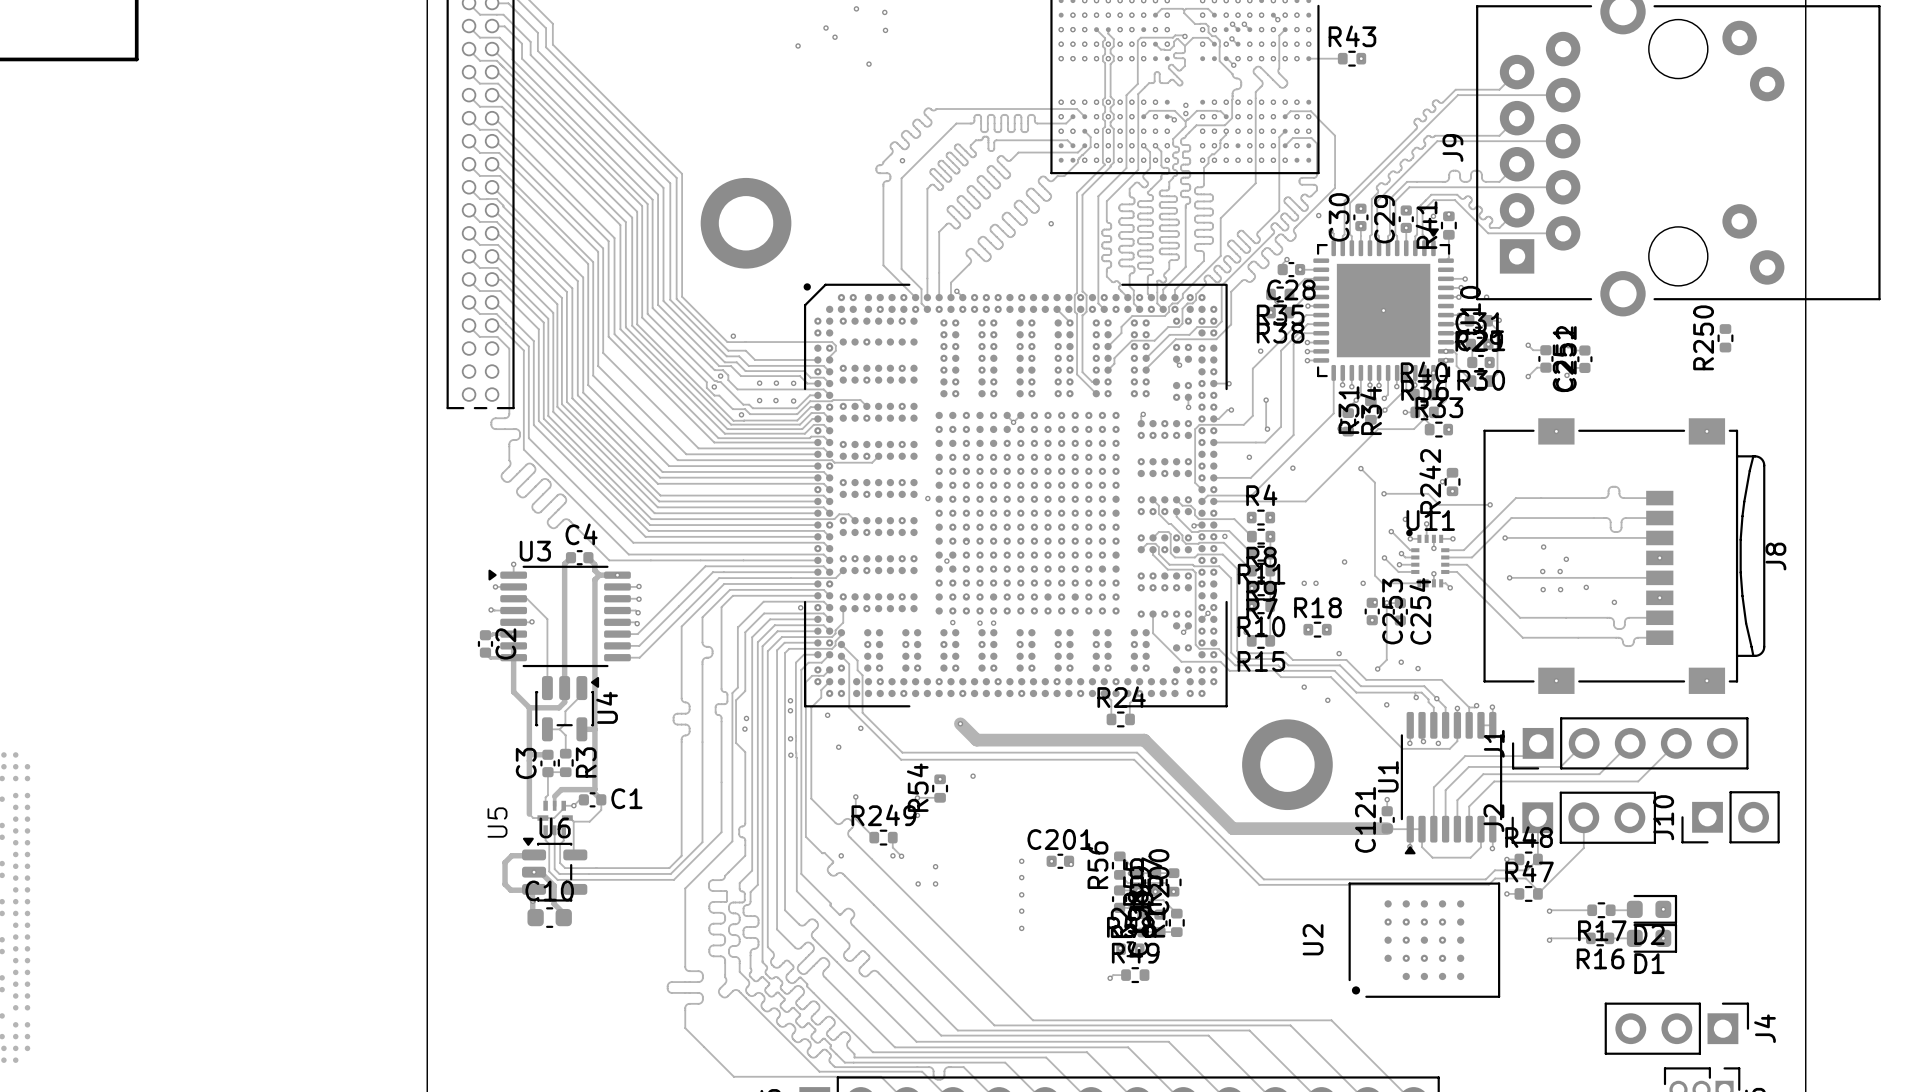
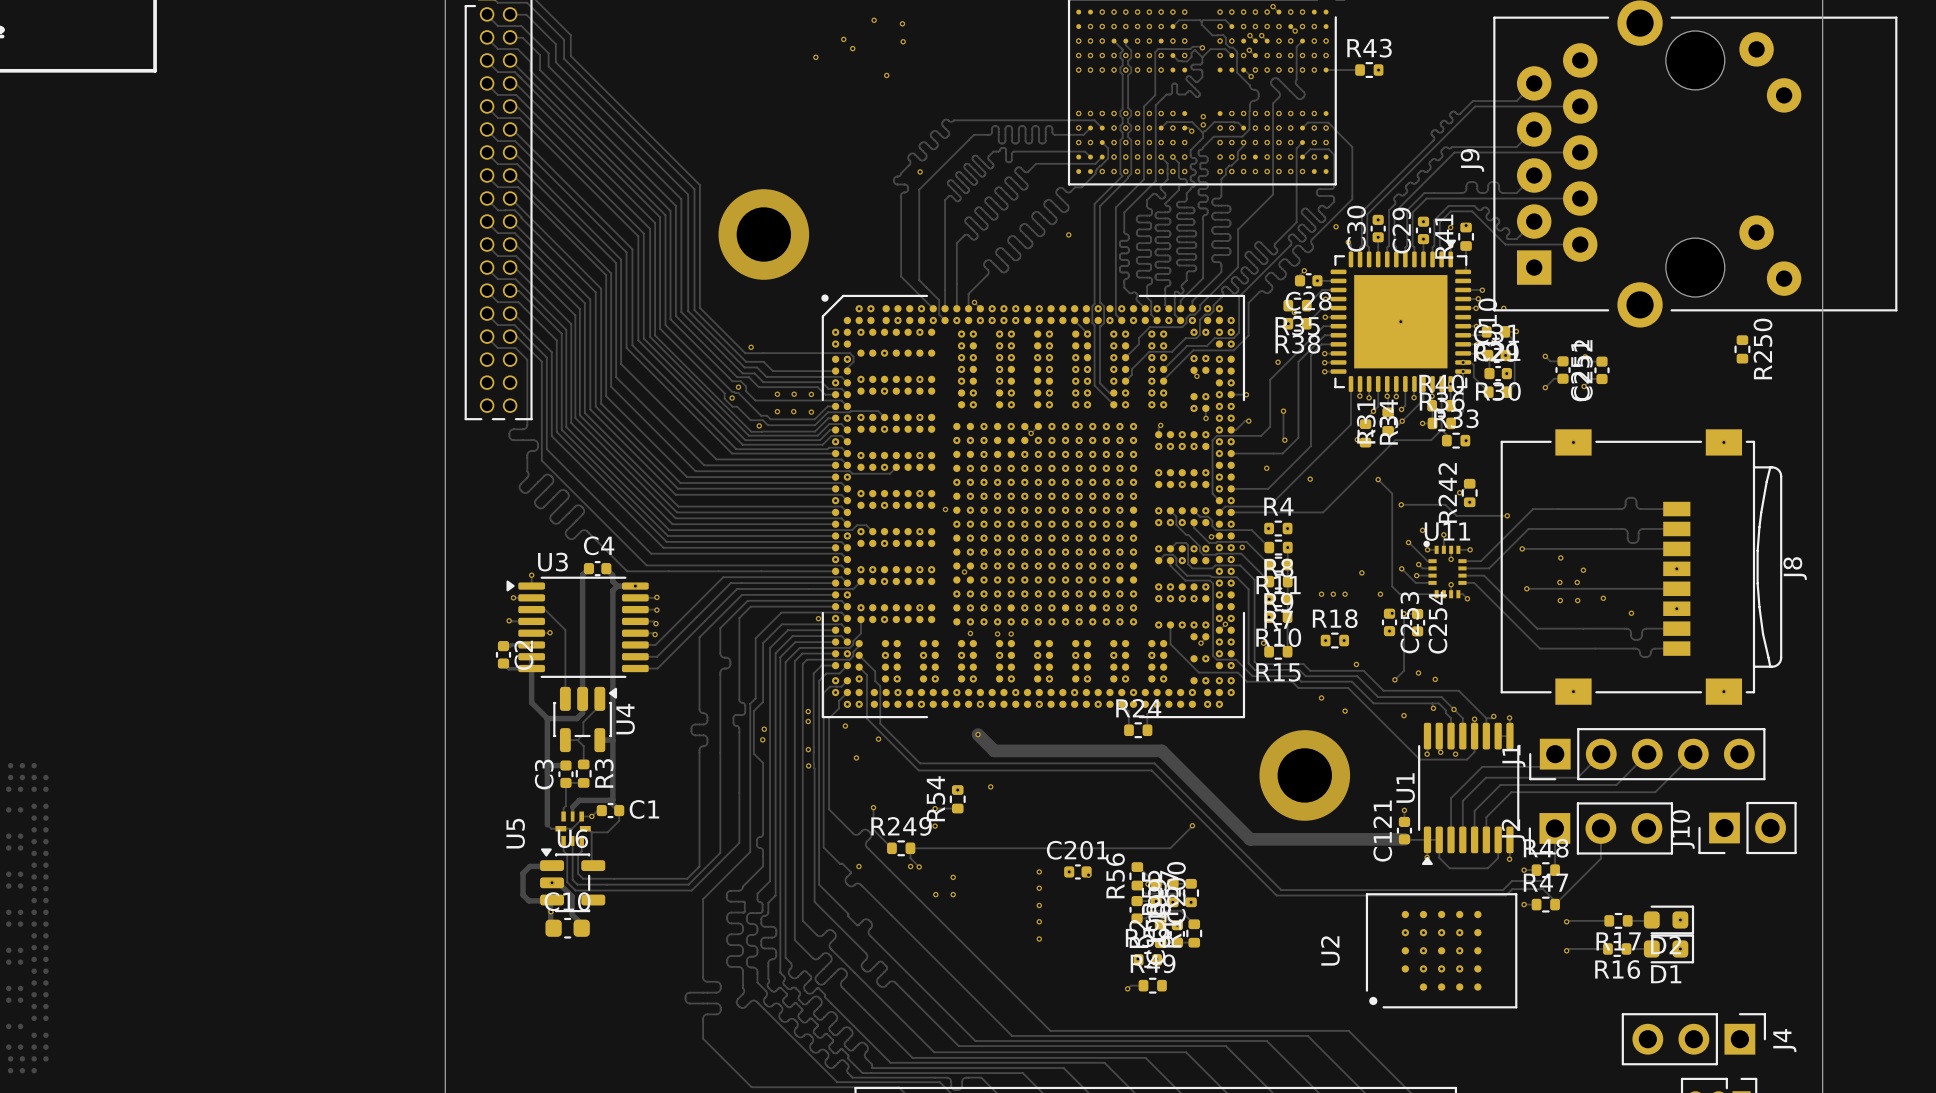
R250 name position: R250 (1703, 337) -> R250 (1762, 348)
via: none -> (1345, 594)
track: none -> (1192, 825) (1170, 848) (910, 848)
via: none -> (1192, 825)

